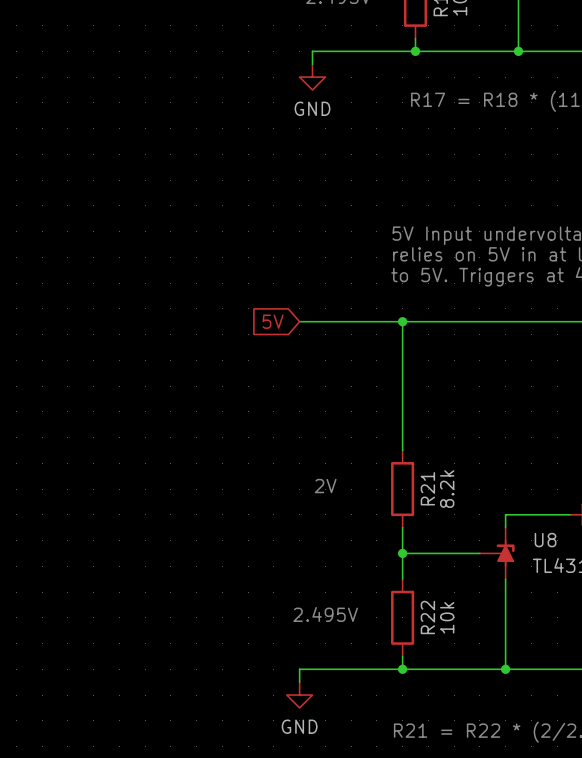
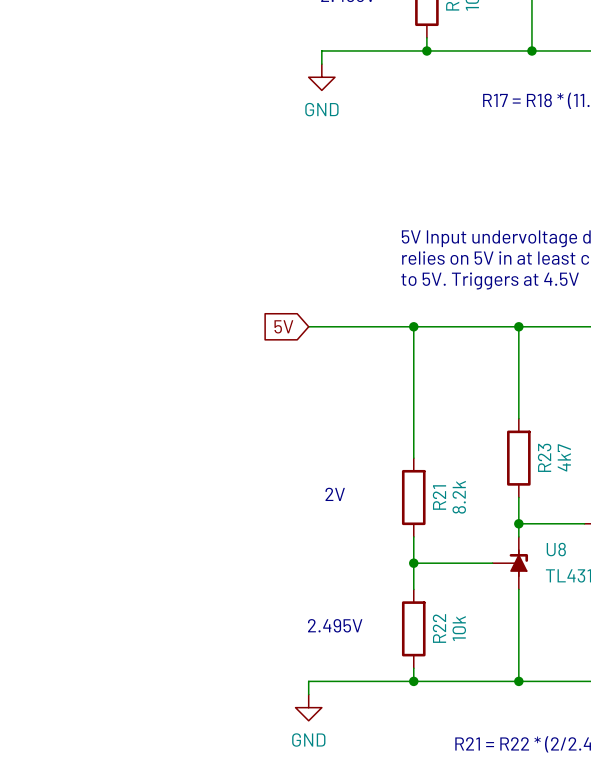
wire: none -> (518, 326) (518, 418)
junction: none -> (518, 326)
R23: none -> 4k7 (518, 458)
wire: none -> (518, 497) (518, 523)
junction: none -> (518, 523)

